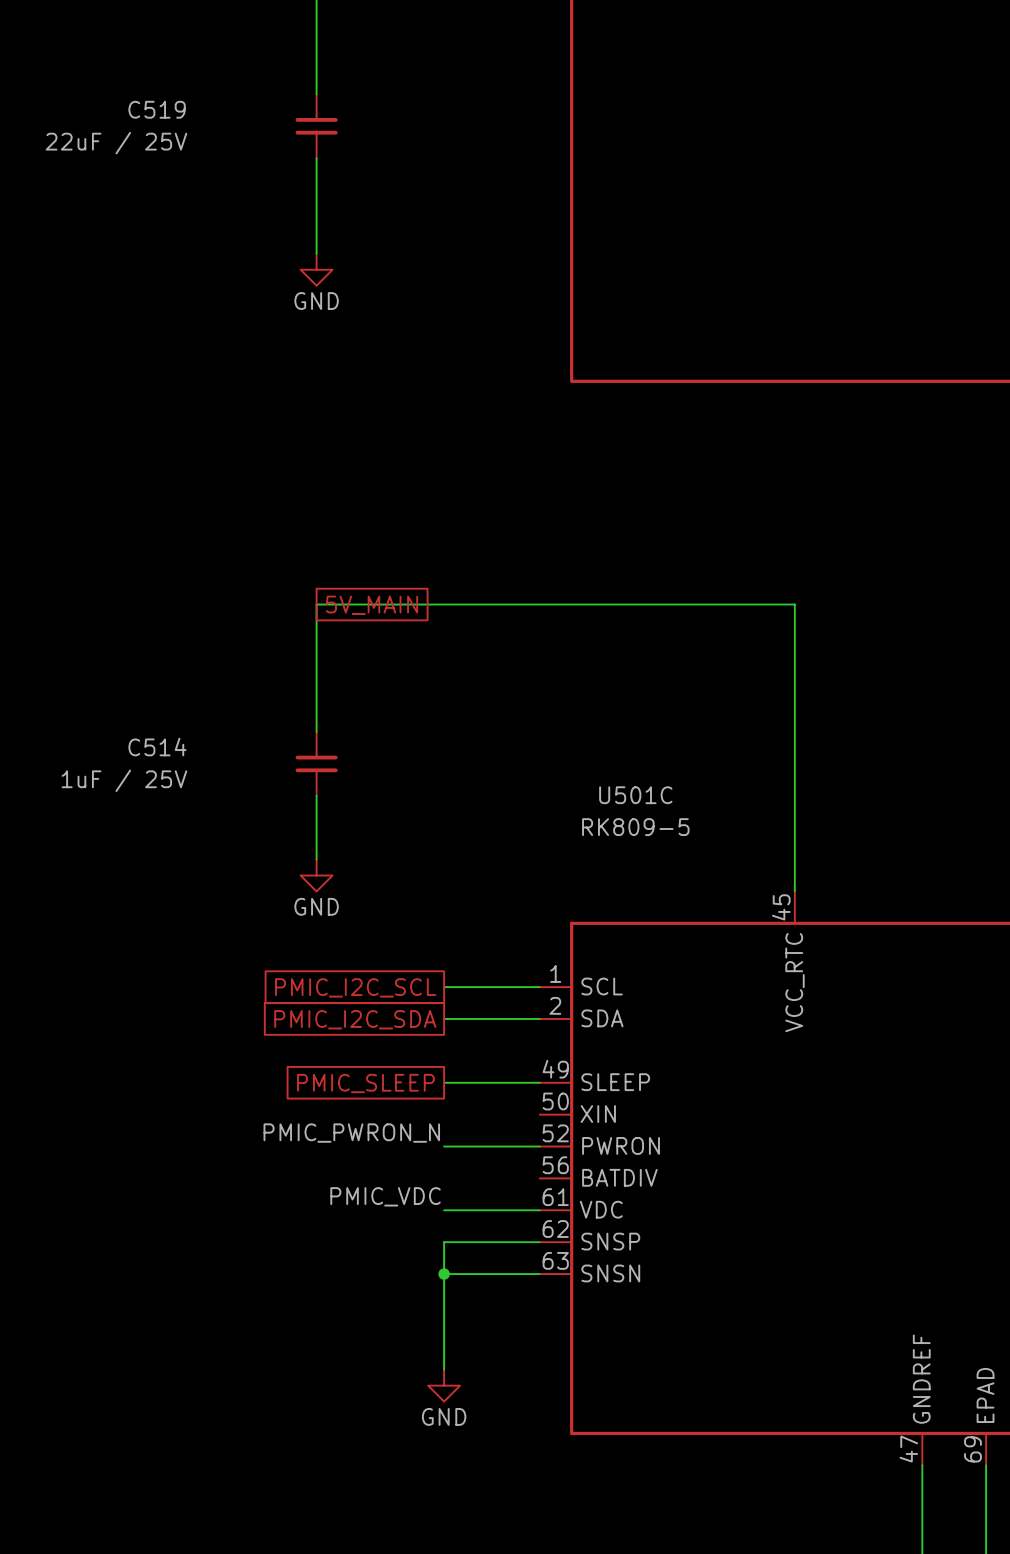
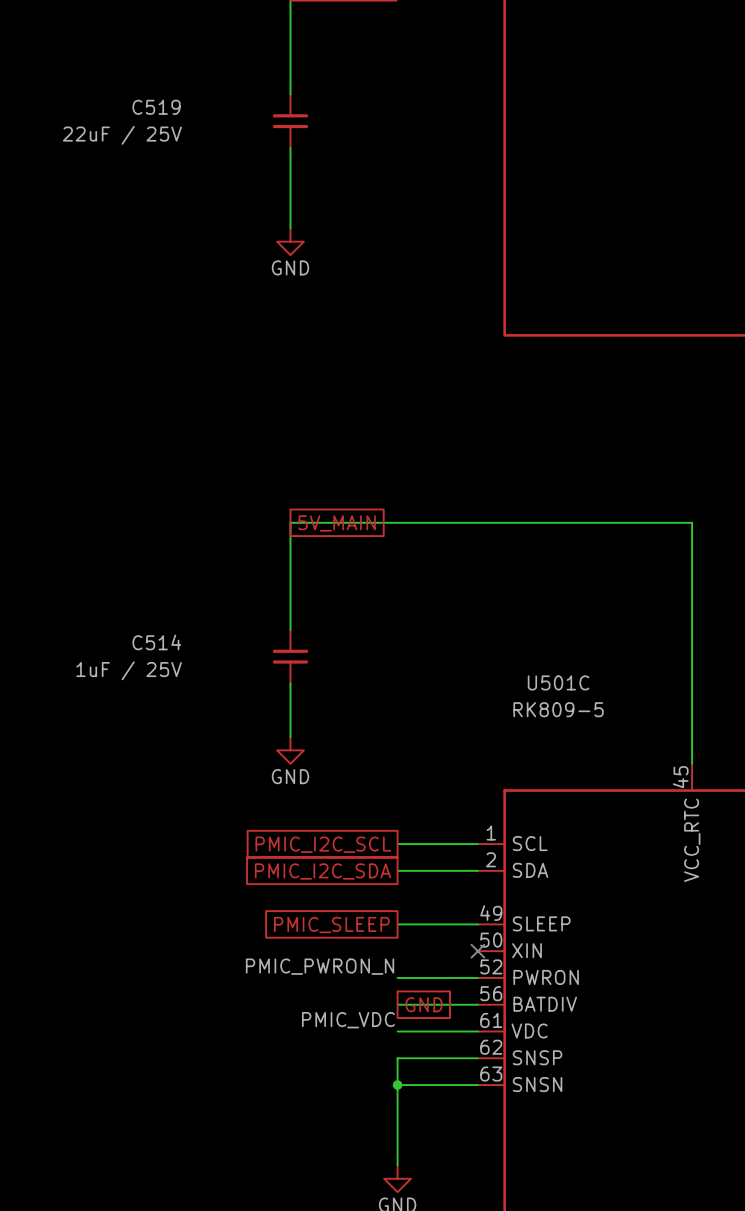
no-connect mark: none -> (477, 951)
wire: none -> (397, 1004) (477, 1004)
global label: none -> GND (424, 1004)

